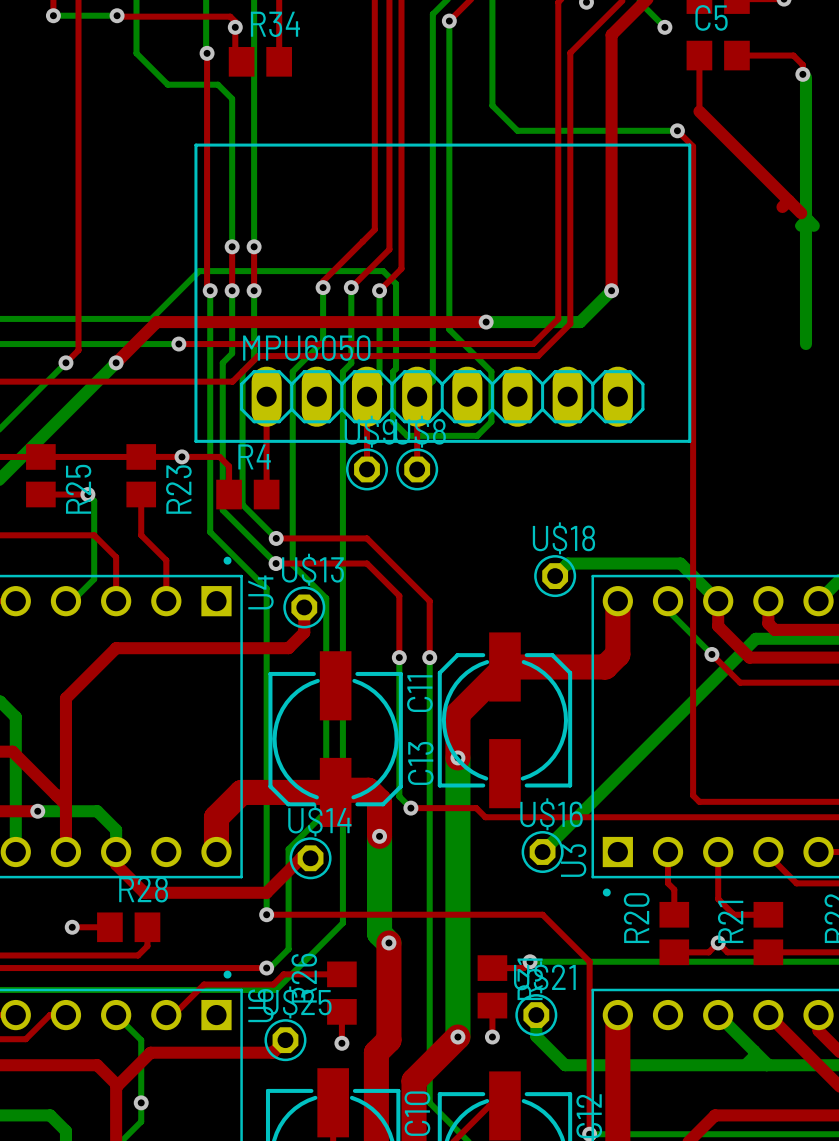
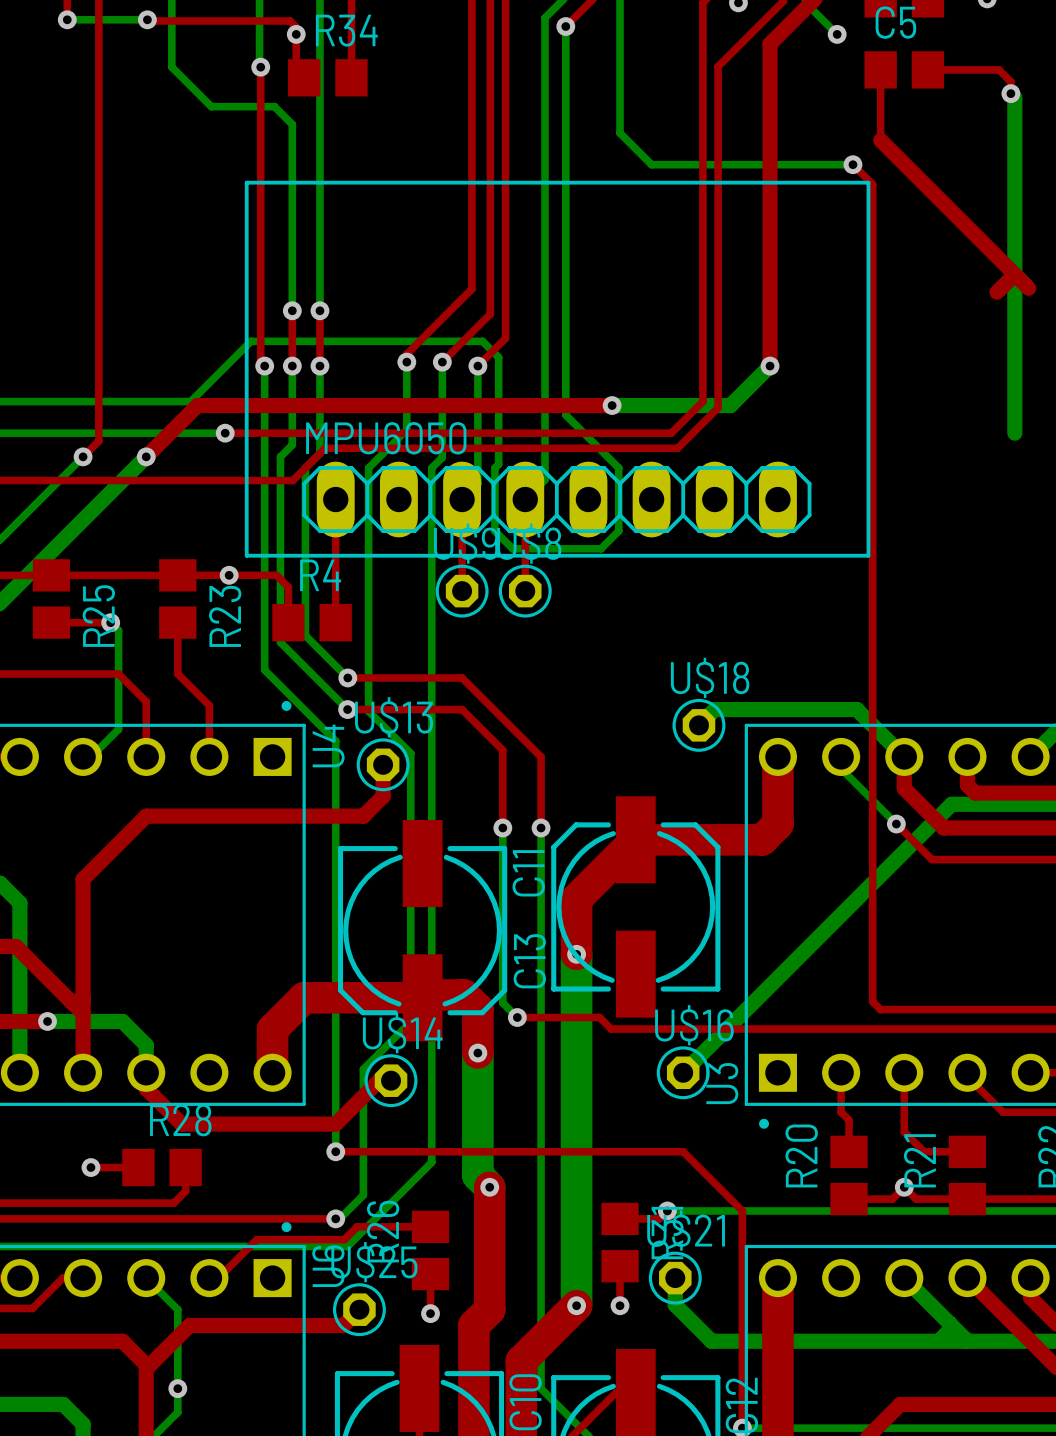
top track: (788, 200) (782, 207) -> none
top track: none -> (1008, 268) (1028, 288)
top track: none -> (1012, 276) (997, 292)

